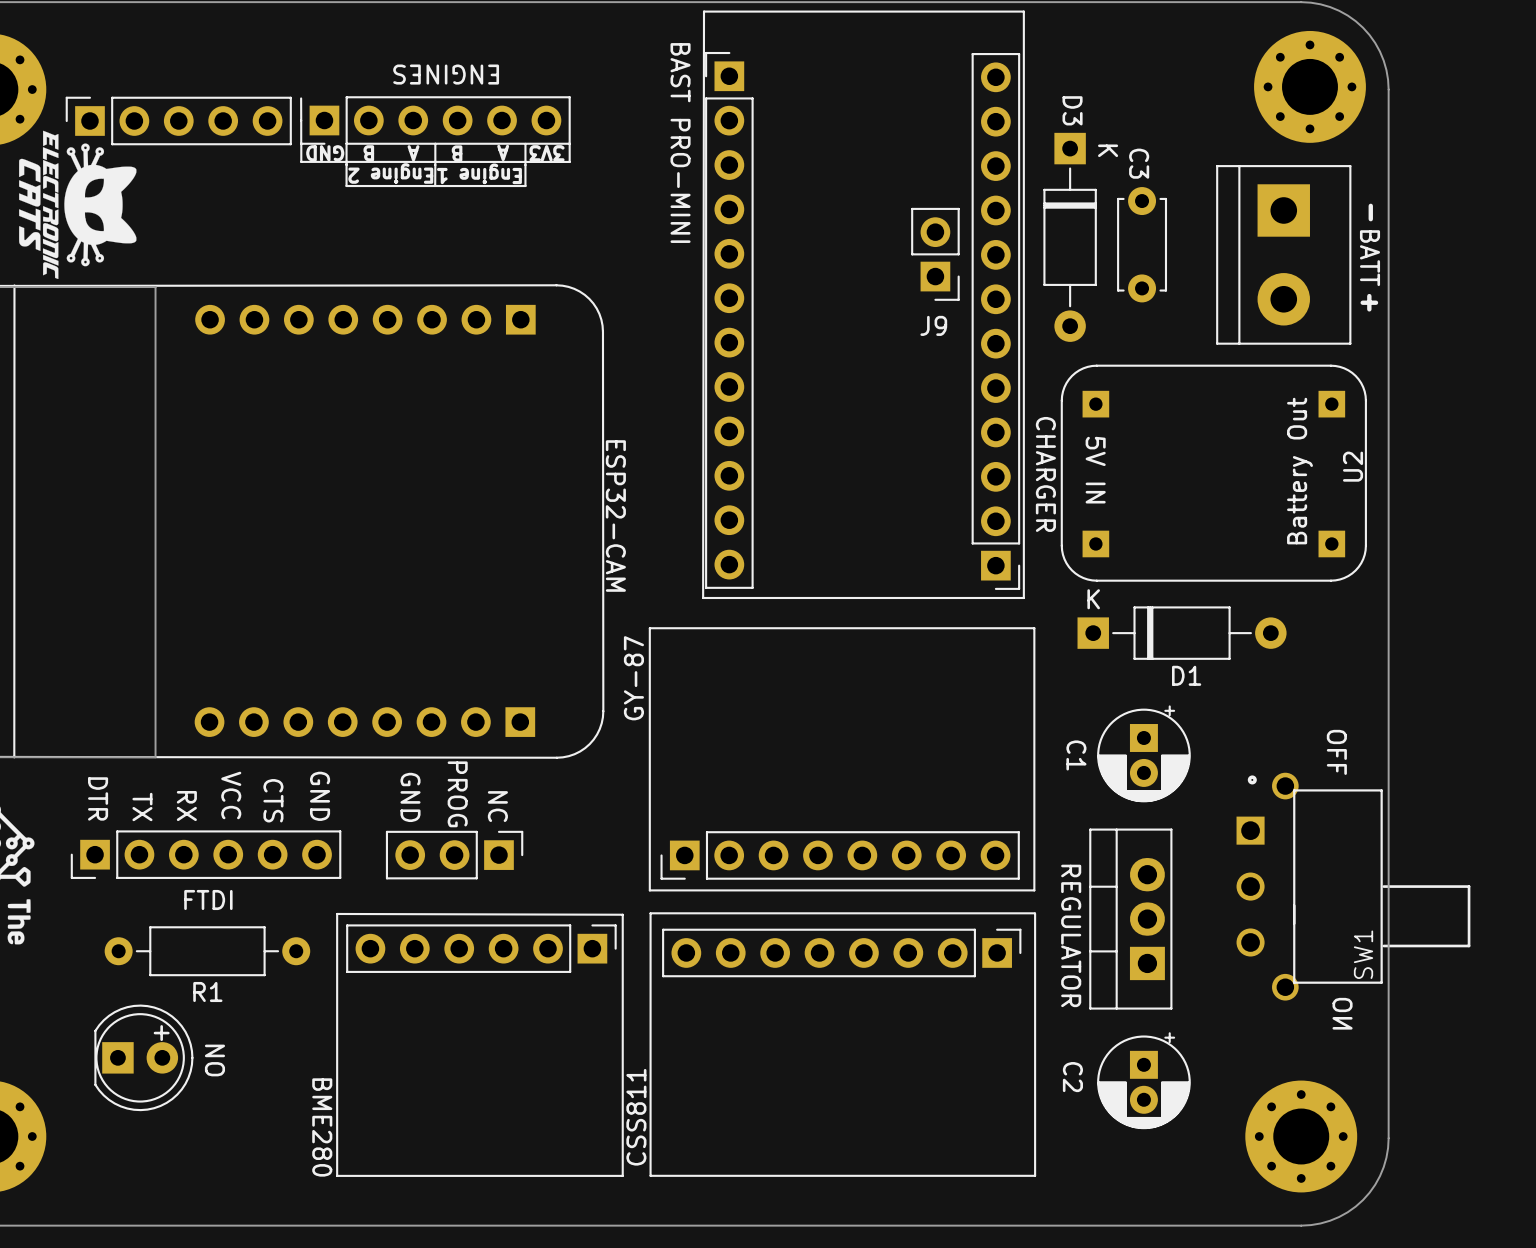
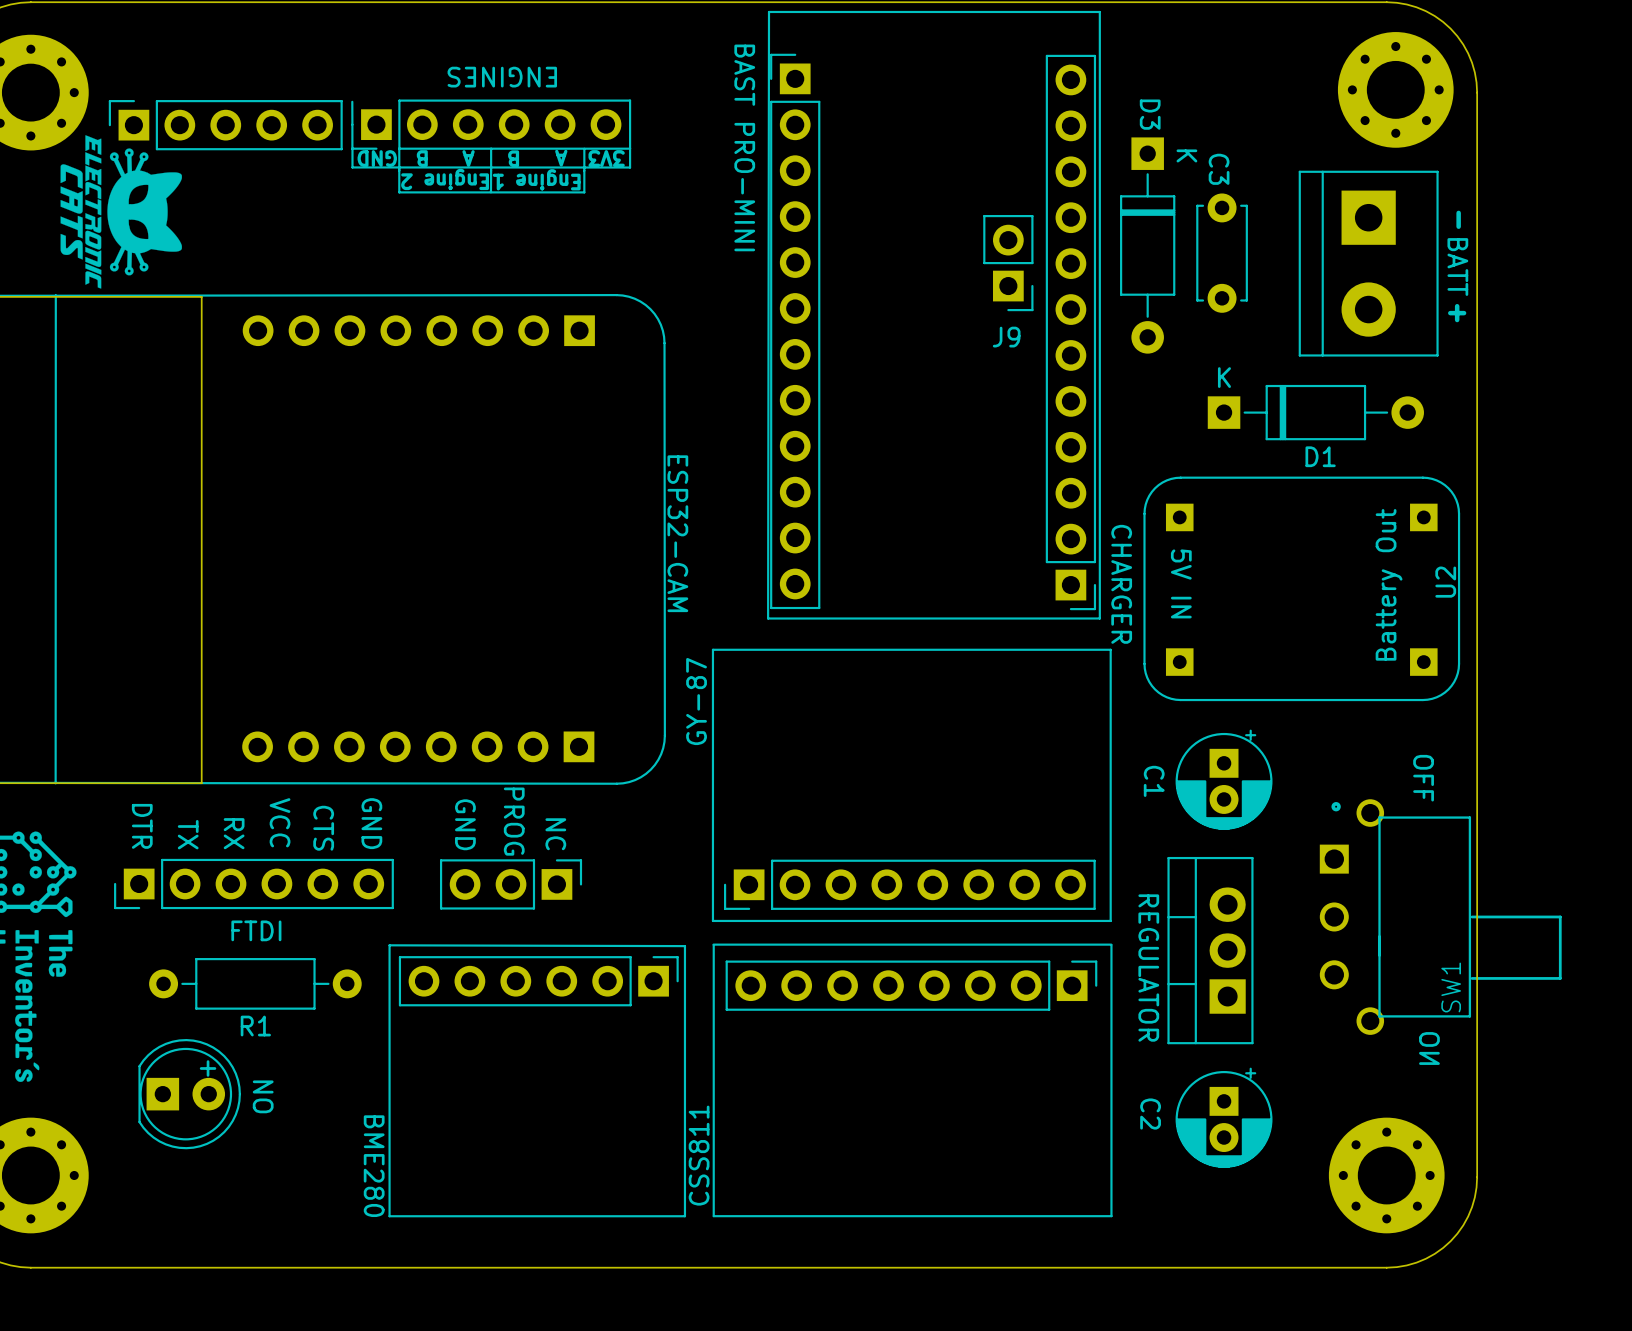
text position: 5V IN (1095, 470) -> 5V IN (1181, 583)
text position: Battery Out (1300, 471) -> Battery Out (1389, 584)
U2 position: (1213, 473) -> (1301, 588)
text position: CHARGER (1045, 474) -> CHARGER (1121, 584)
D1 position: (1182, 633) -> (1315, 412)

